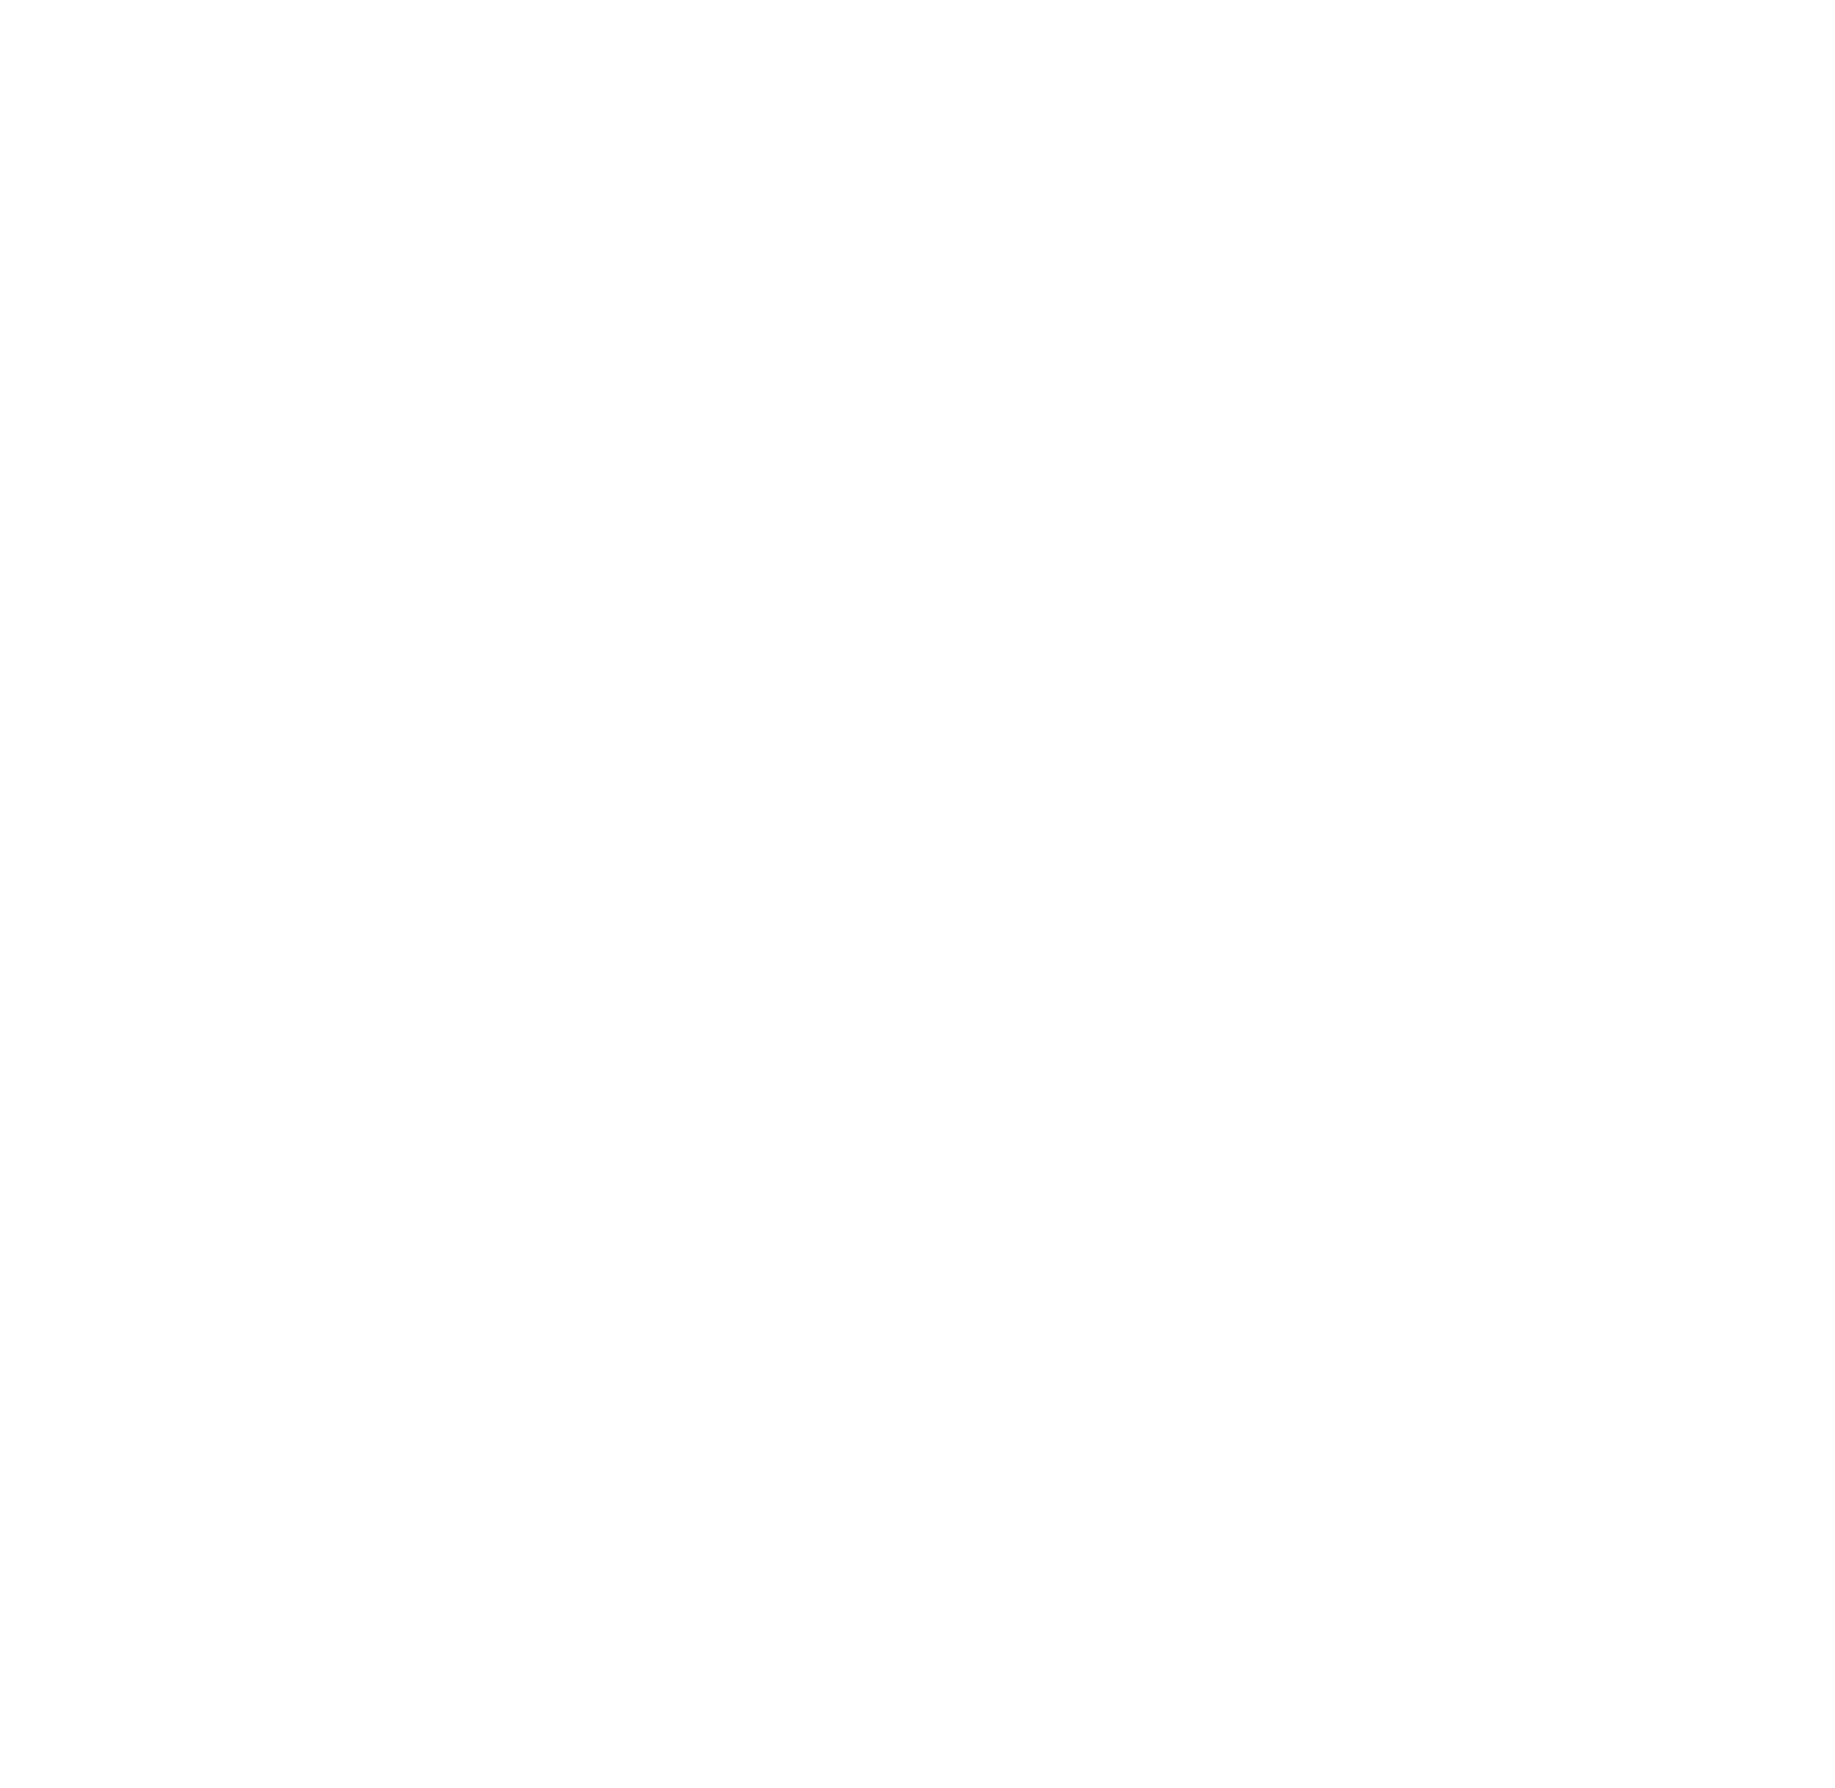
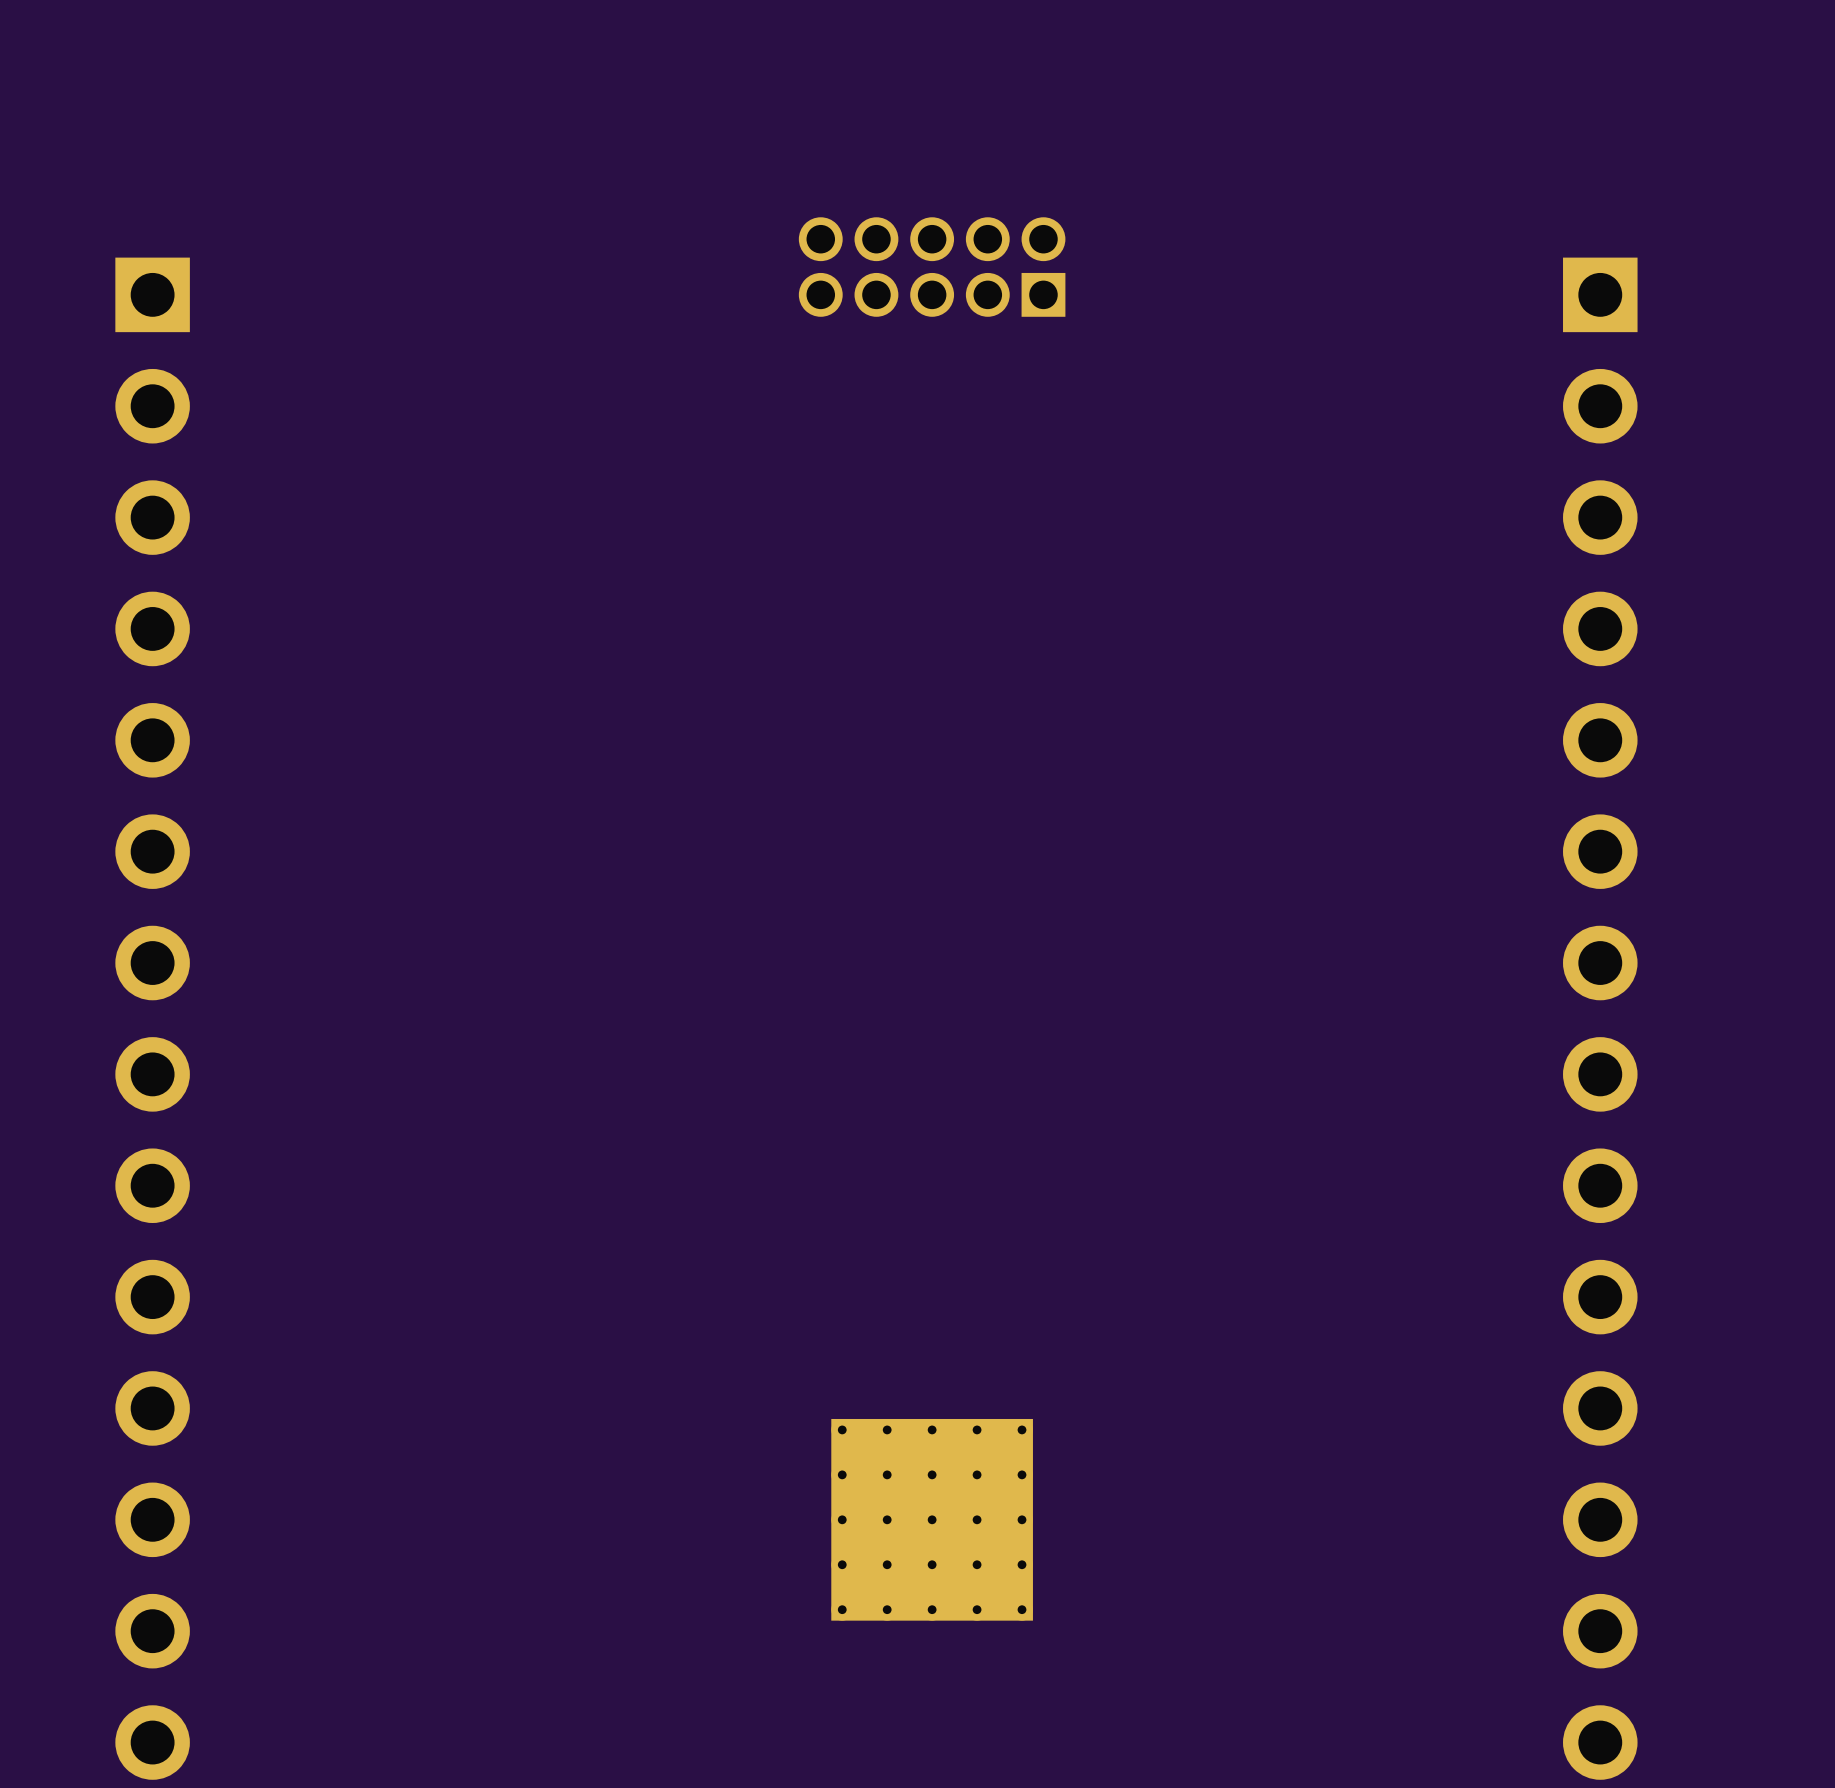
part: none -> (932, 267)
part: none -> (152, 1018)
part: none -> (1600, 1018)
part: none -> (932, 1519)

